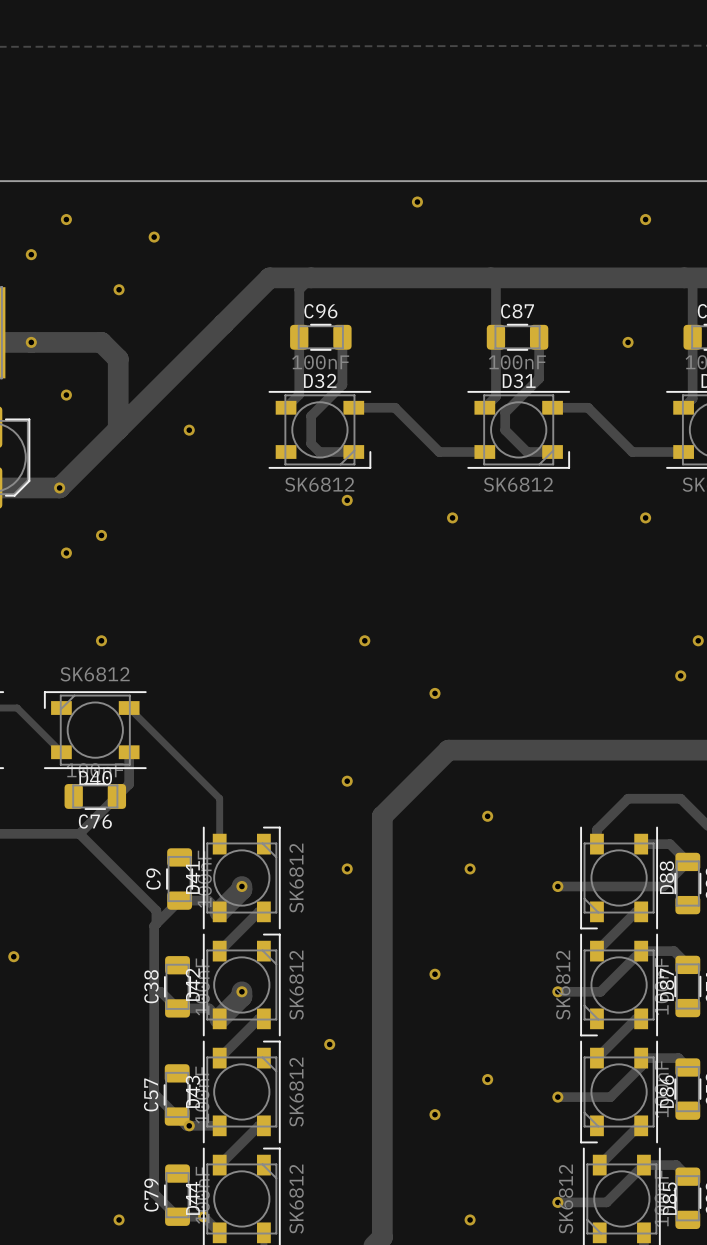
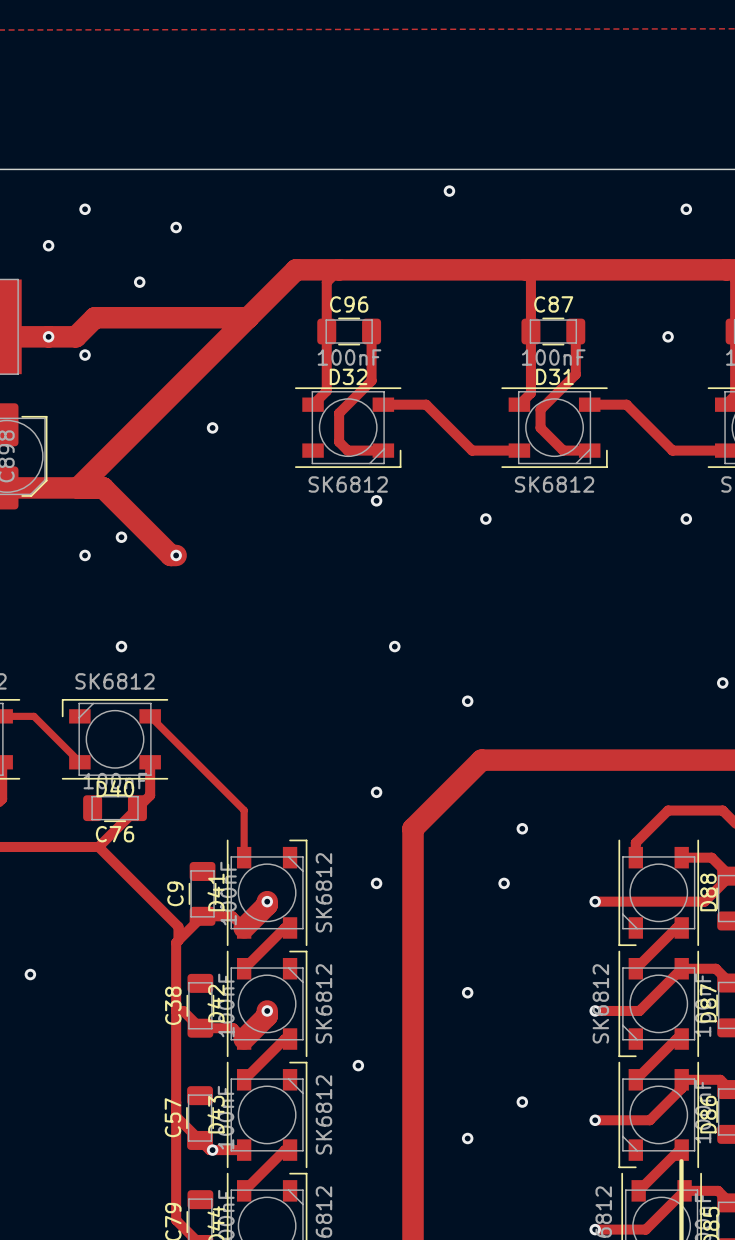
track: (57, 342) (101, 342) (118, 359) (118, 429) -> (75, 336) (94, 317) (248, 317)
via position: (66, 395) -> (85, 355)
track: none -> (77, 487) (103, 487) (170, 555) (176, 555)
via: (59, 487) -> none
via: none -> (176, 555)

